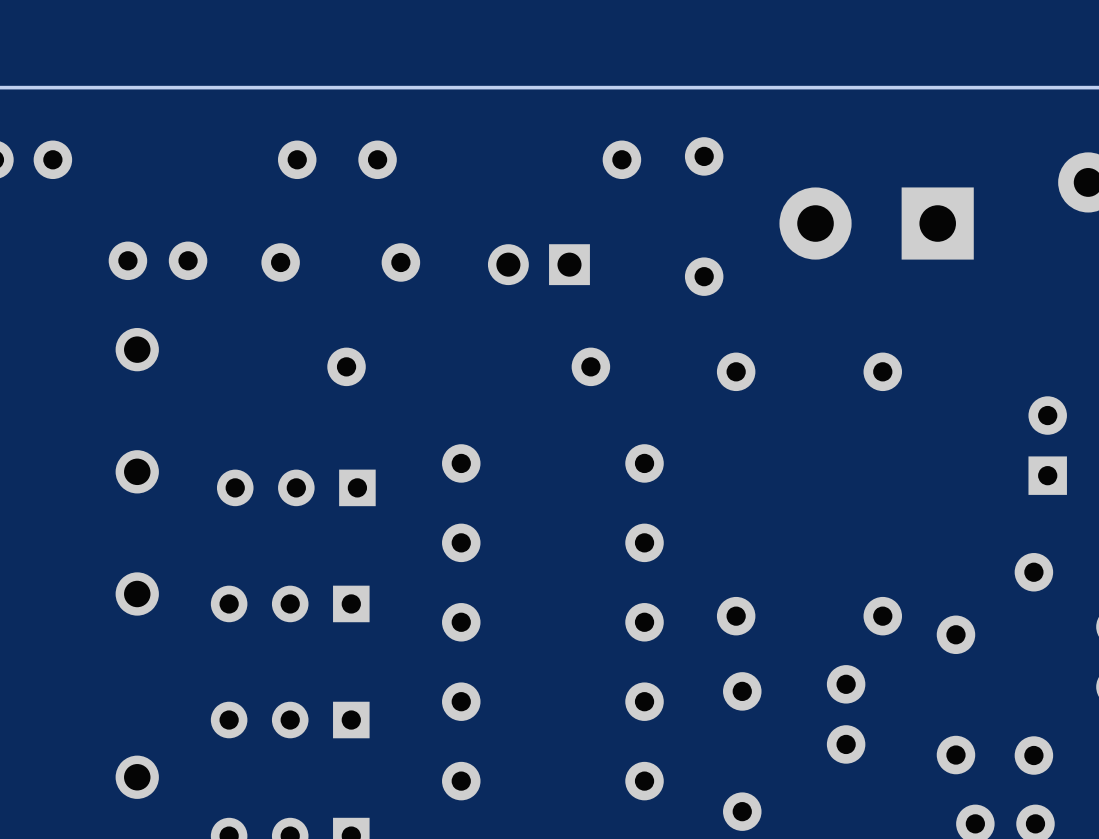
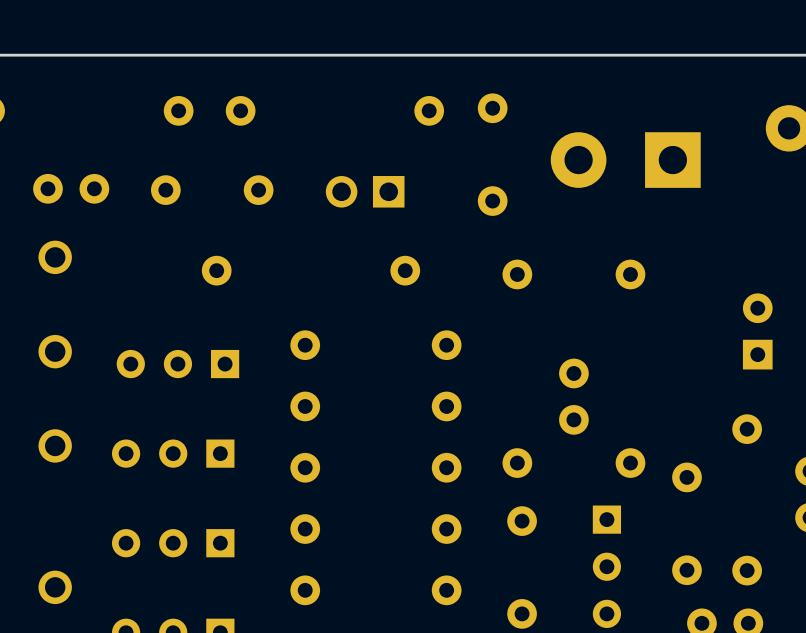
part position: (846, 714) -> (573, 396)
part: none -> (606, 566)

